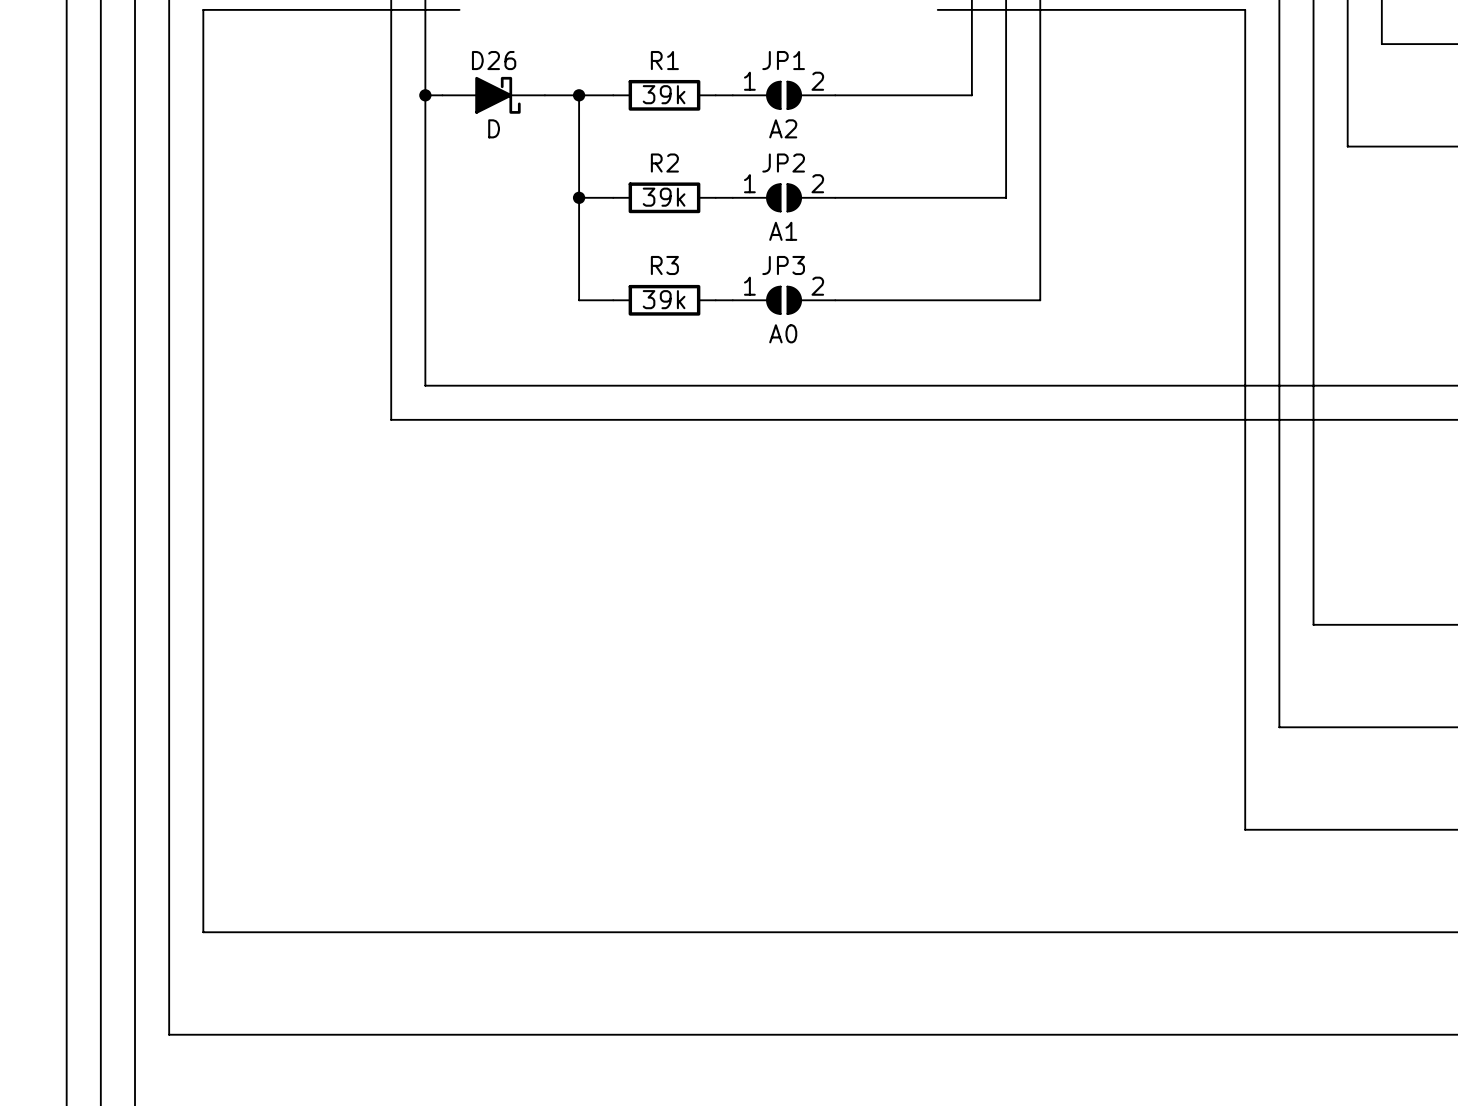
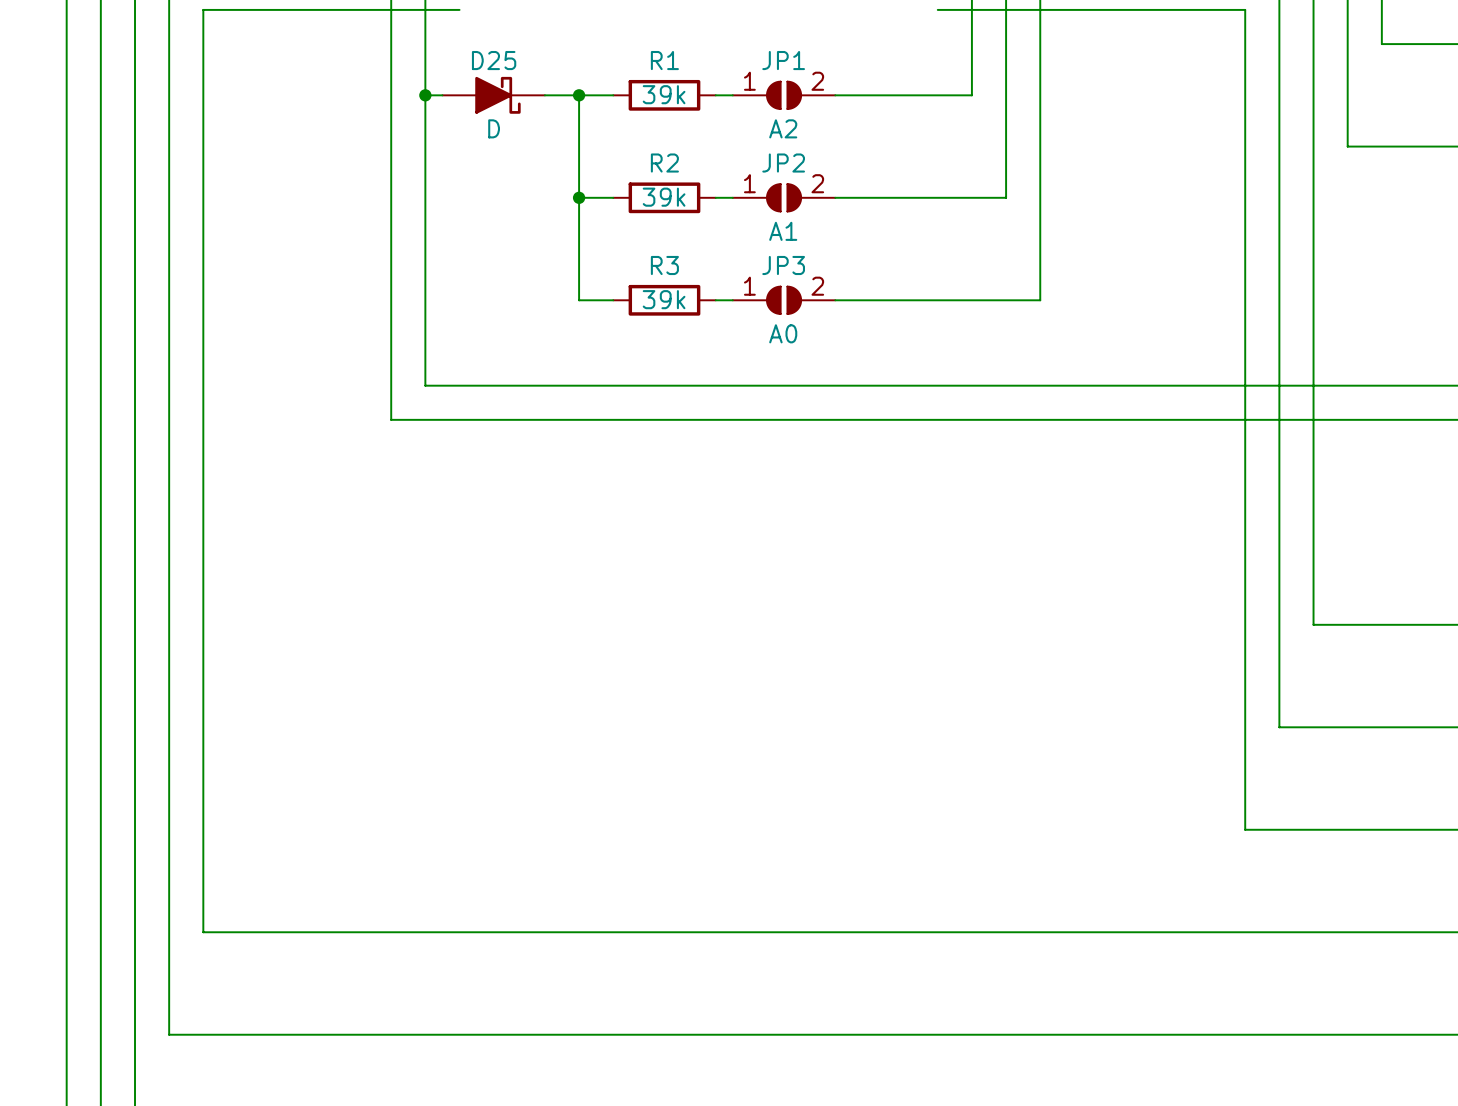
D26 name: D26 (494, 60) -> D25 (494, 60)

